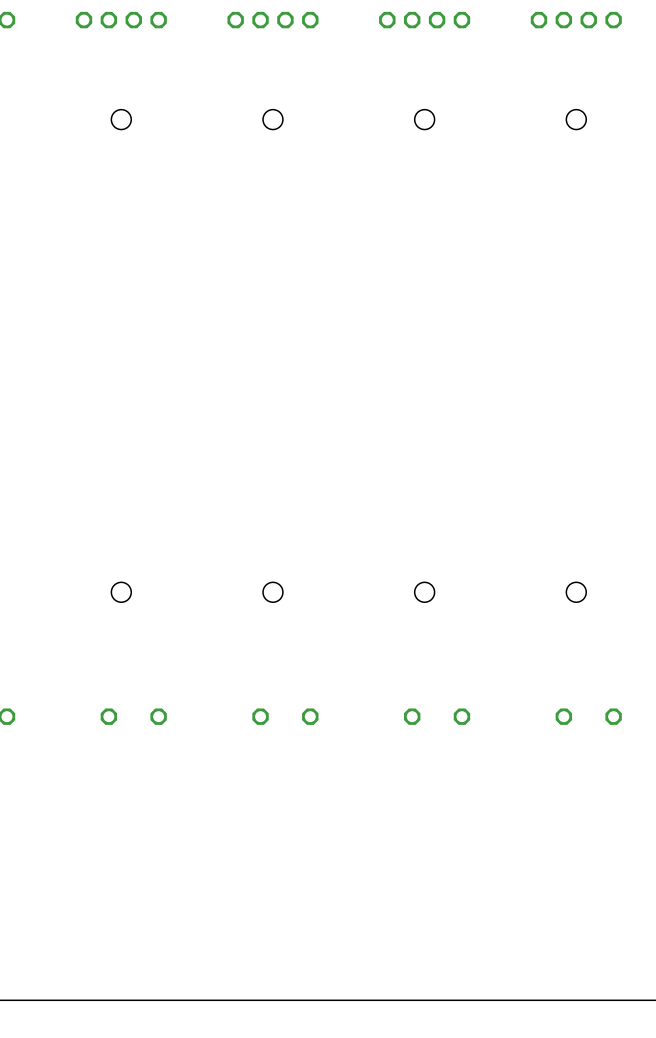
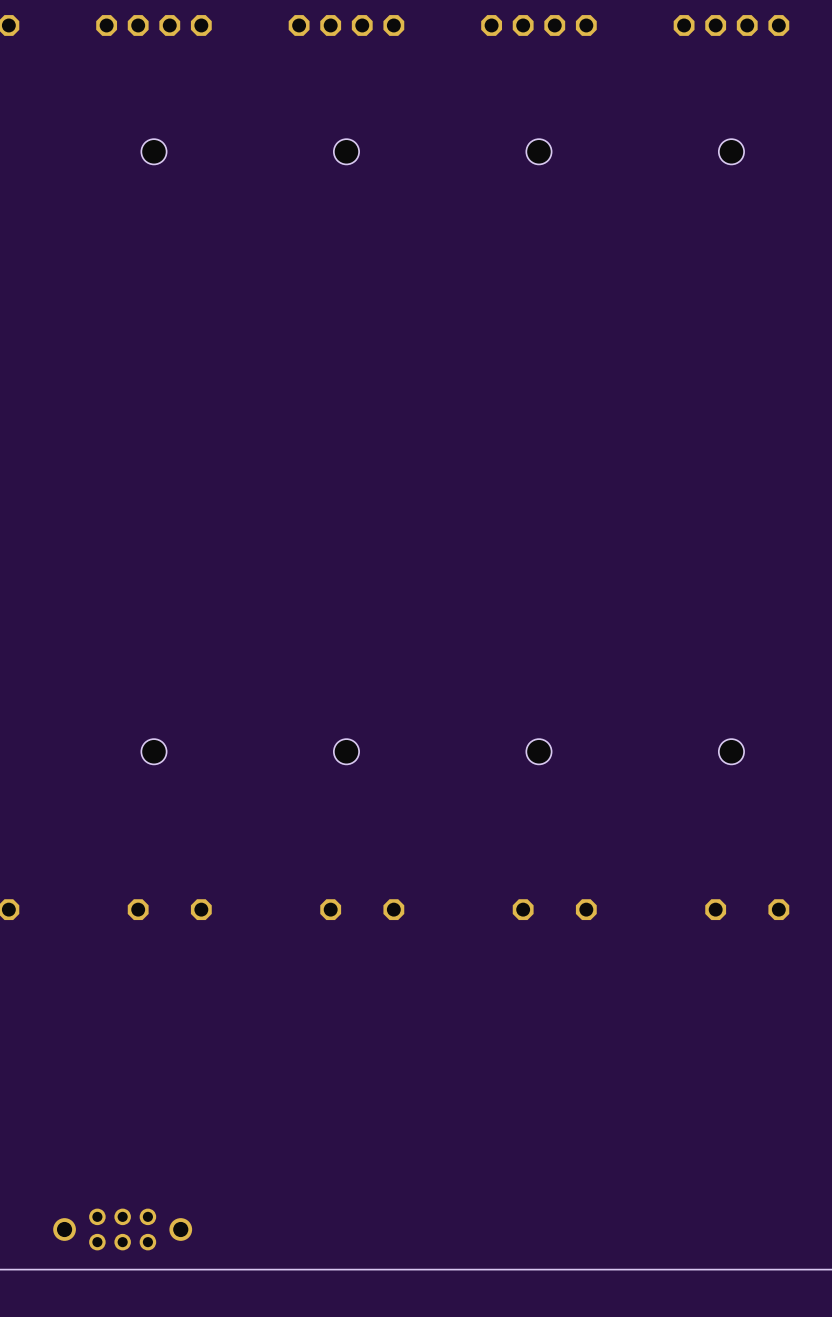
part: none -> (122, 1229)

